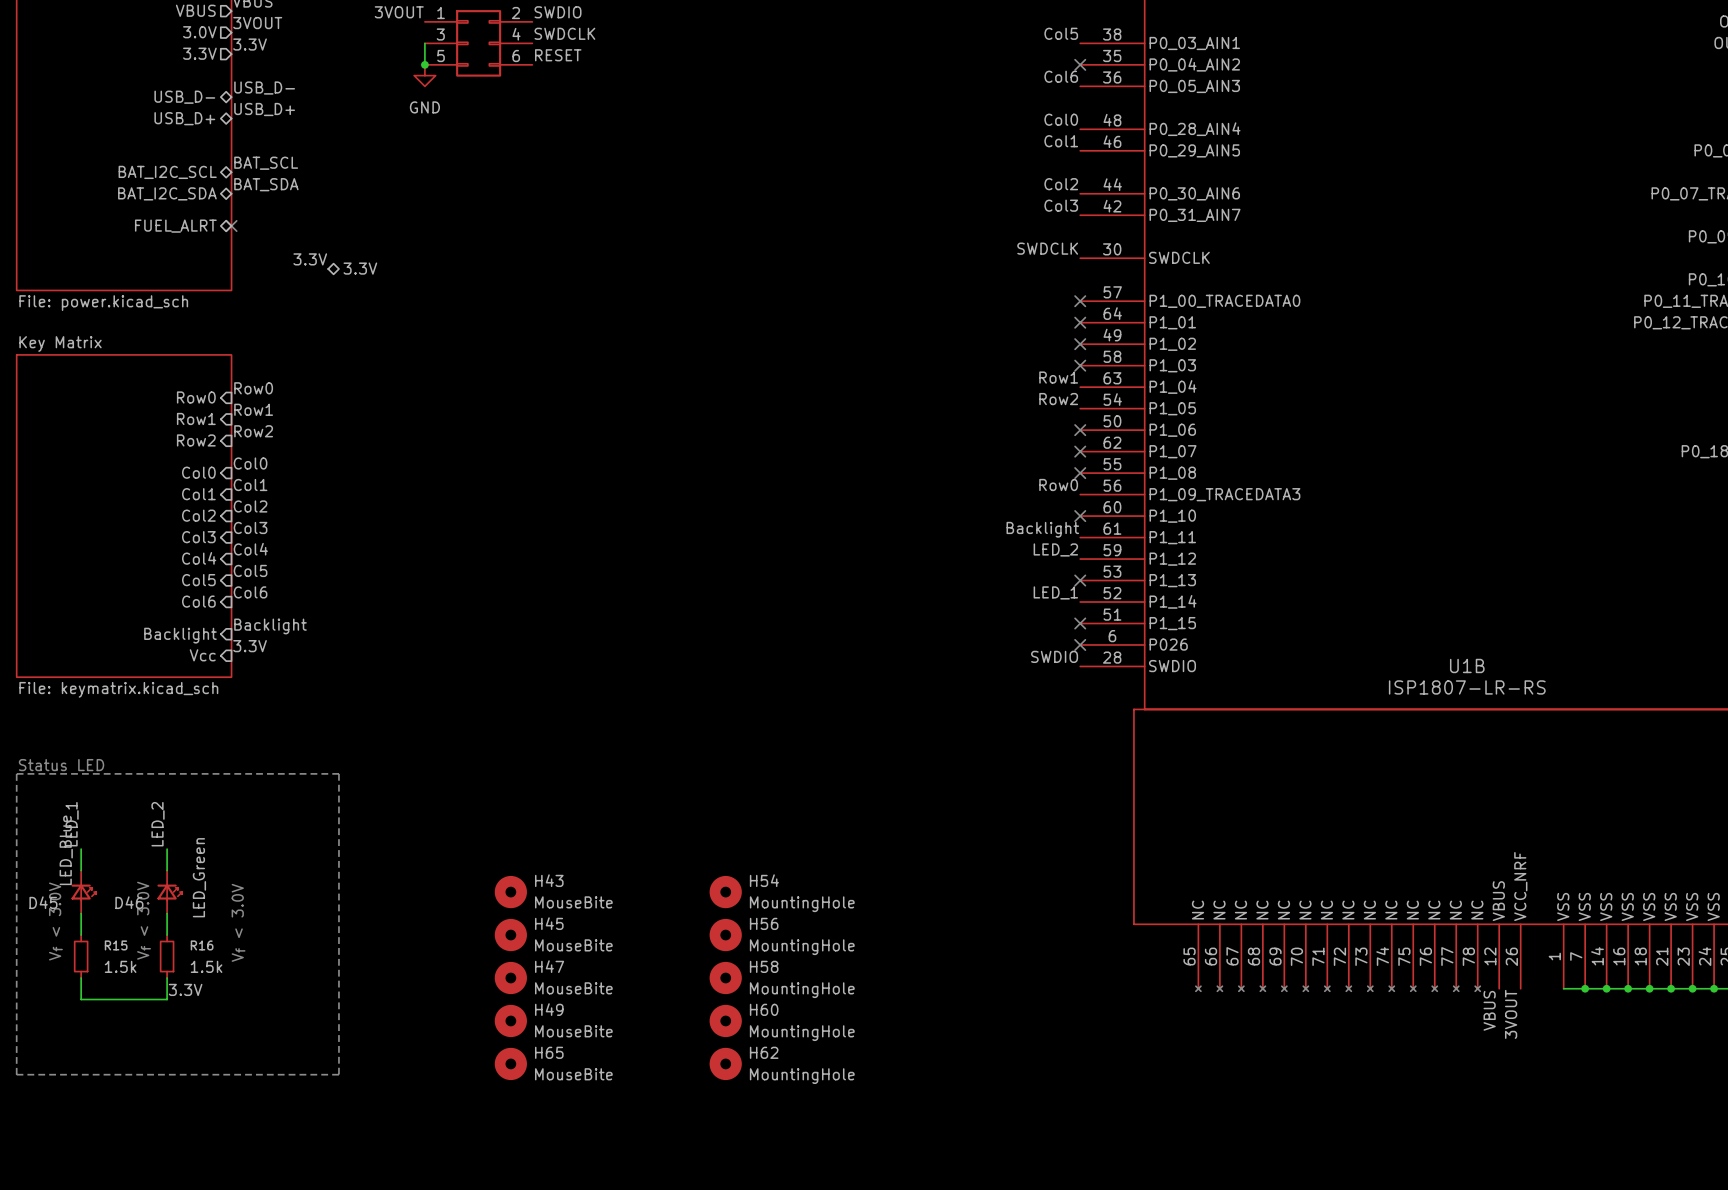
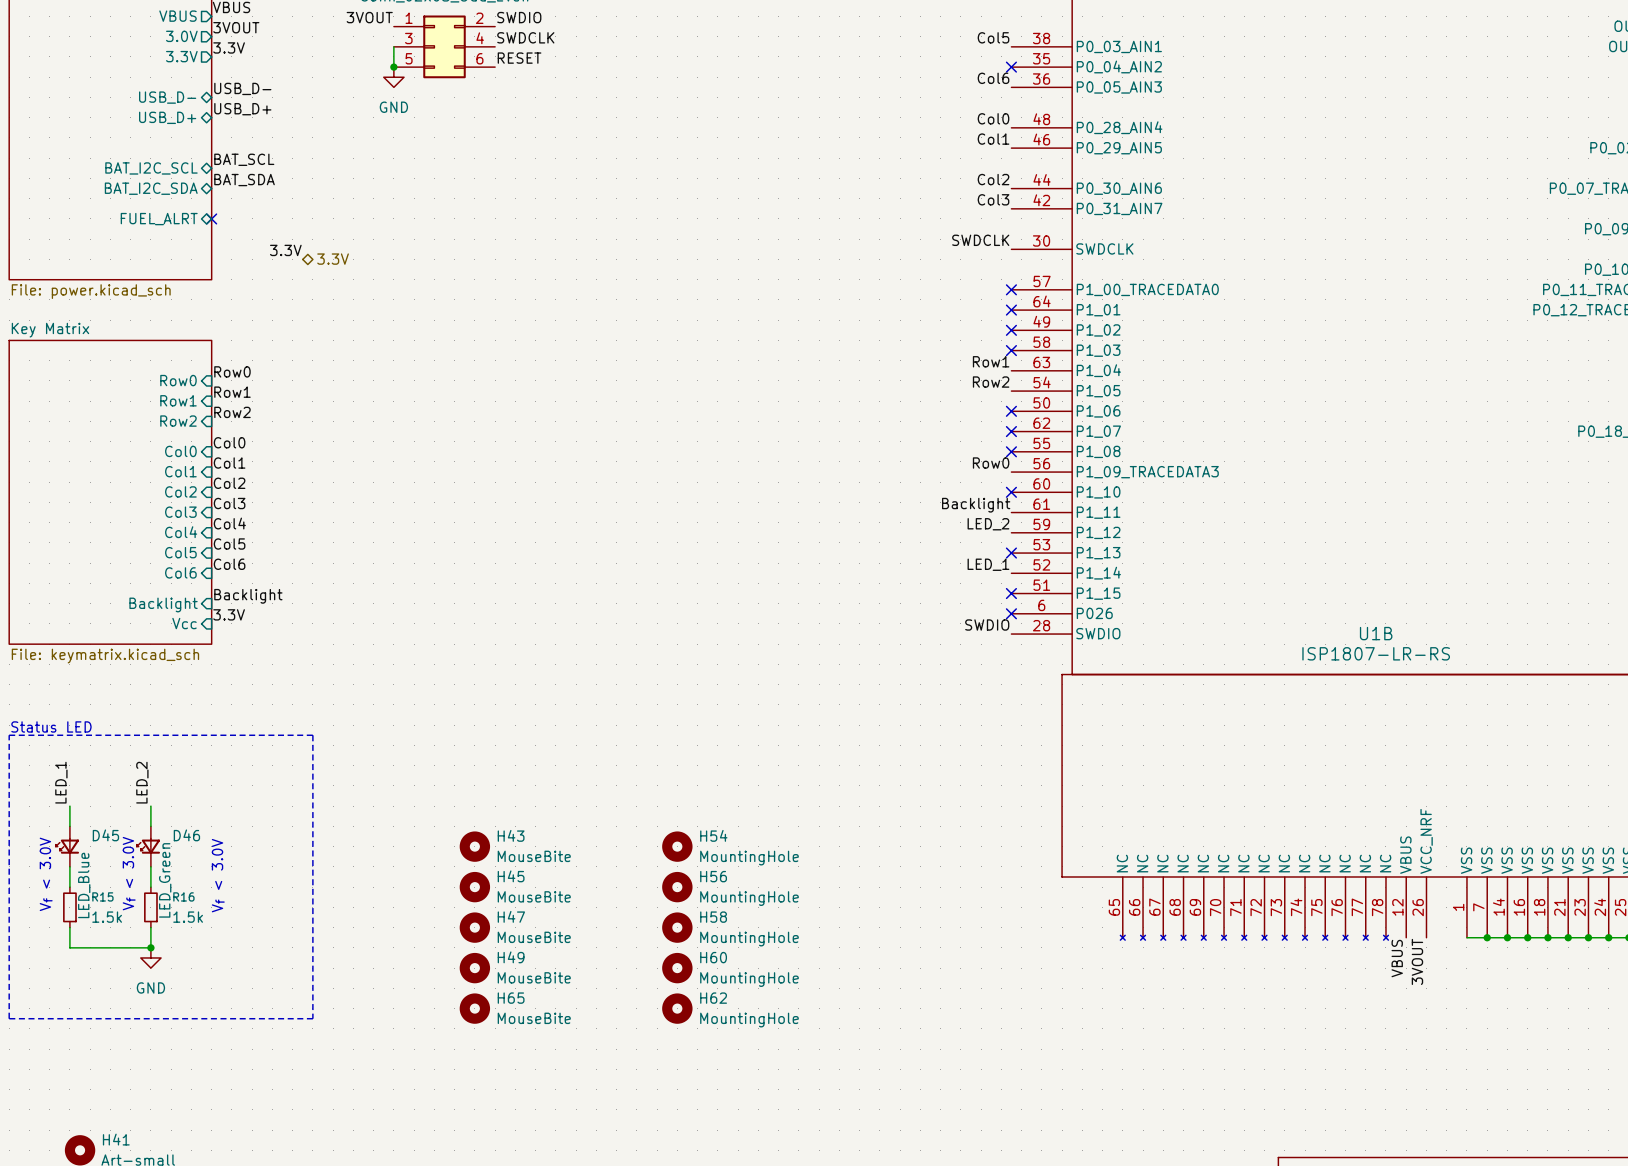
D46 value position: LED_Green (199, 877) -> LED_Green (165, 880)
D45 rotation: 0° (83, 892) -> 180° (67, 846)
D46 rotation: 0° (169, 892) -> 180° (148, 846)
label: 3.3V (185, 989) -> none
junction: none -> (150, 947)
power symbol: none -> GND (150, 957)

